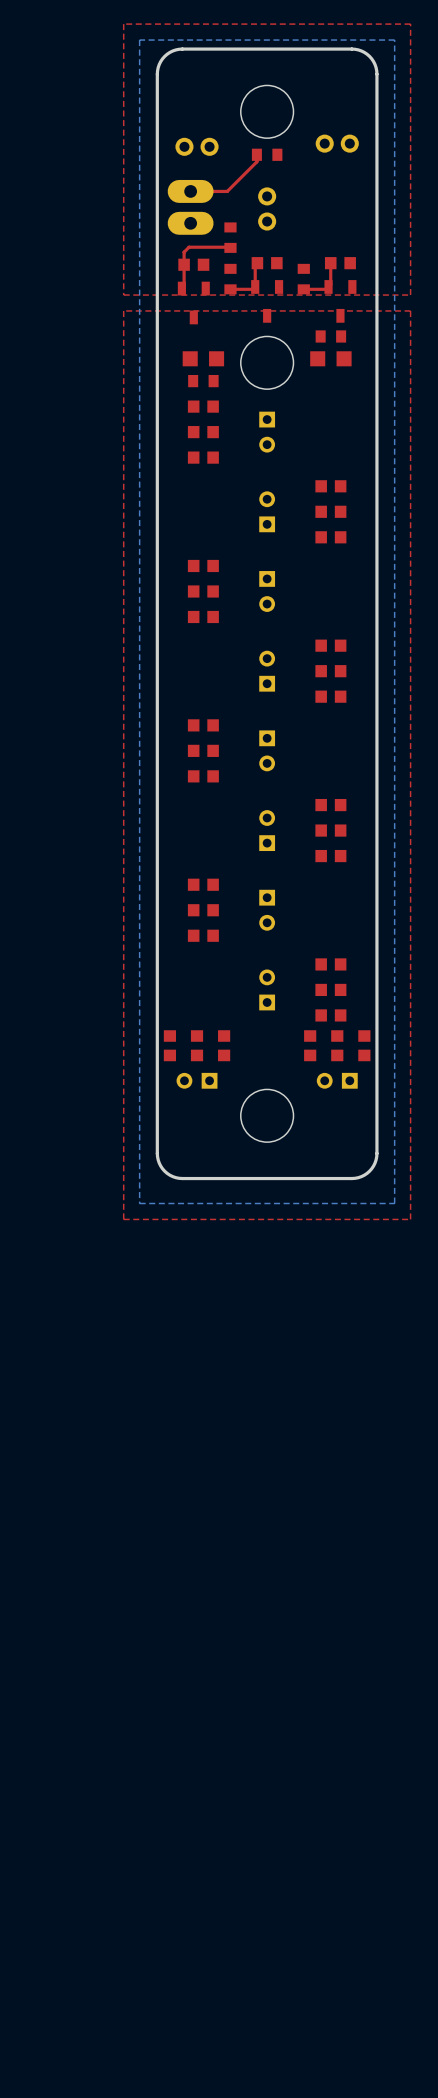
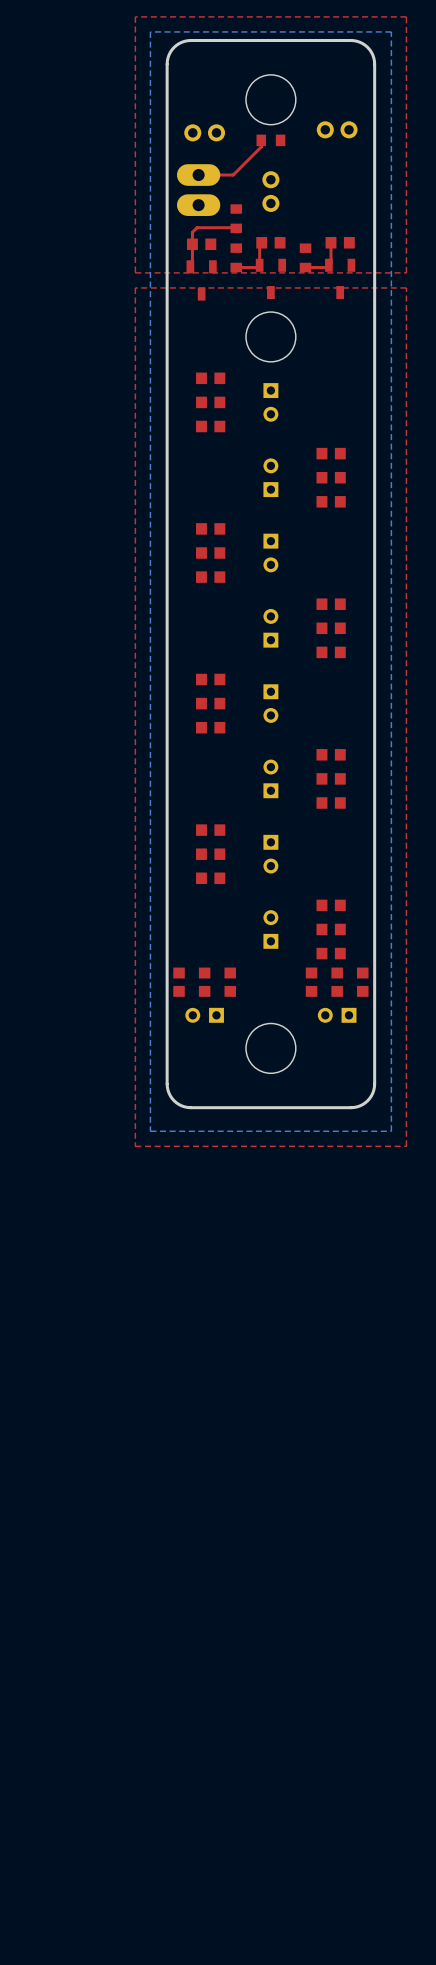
part: (330, 336) -> none
part: (203, 358) -> none
part: (330, 358) -> none
part: (203, 381) -> none

